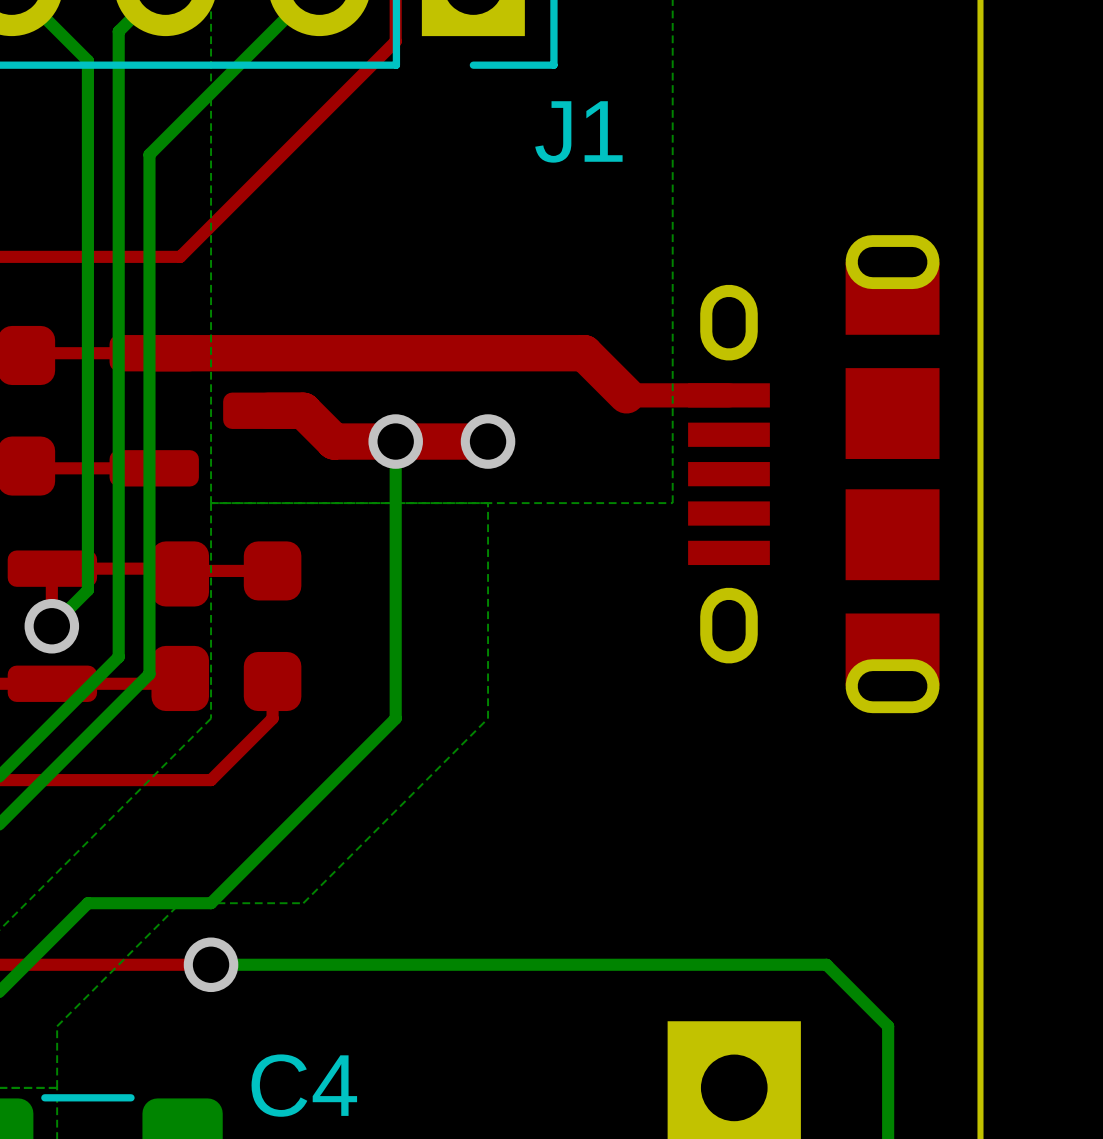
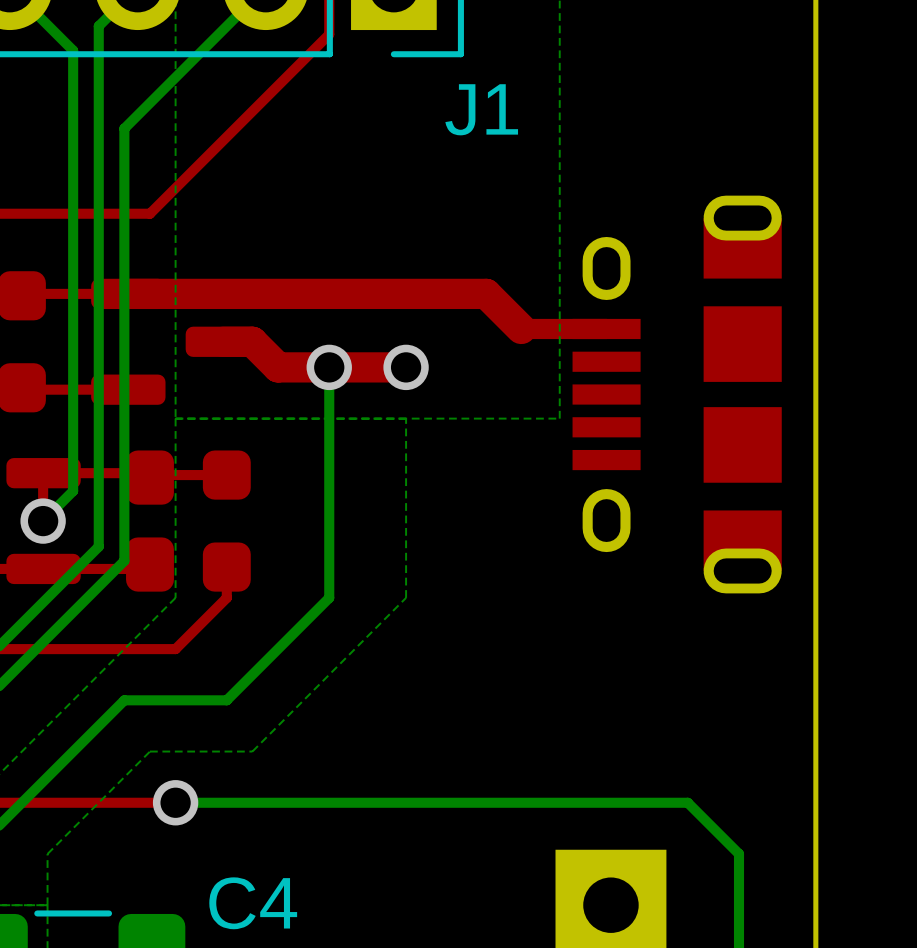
bottom track: (272, 841) (211, 903) (87, 903) -> (226, 700) (124, 700) (73, 751)

